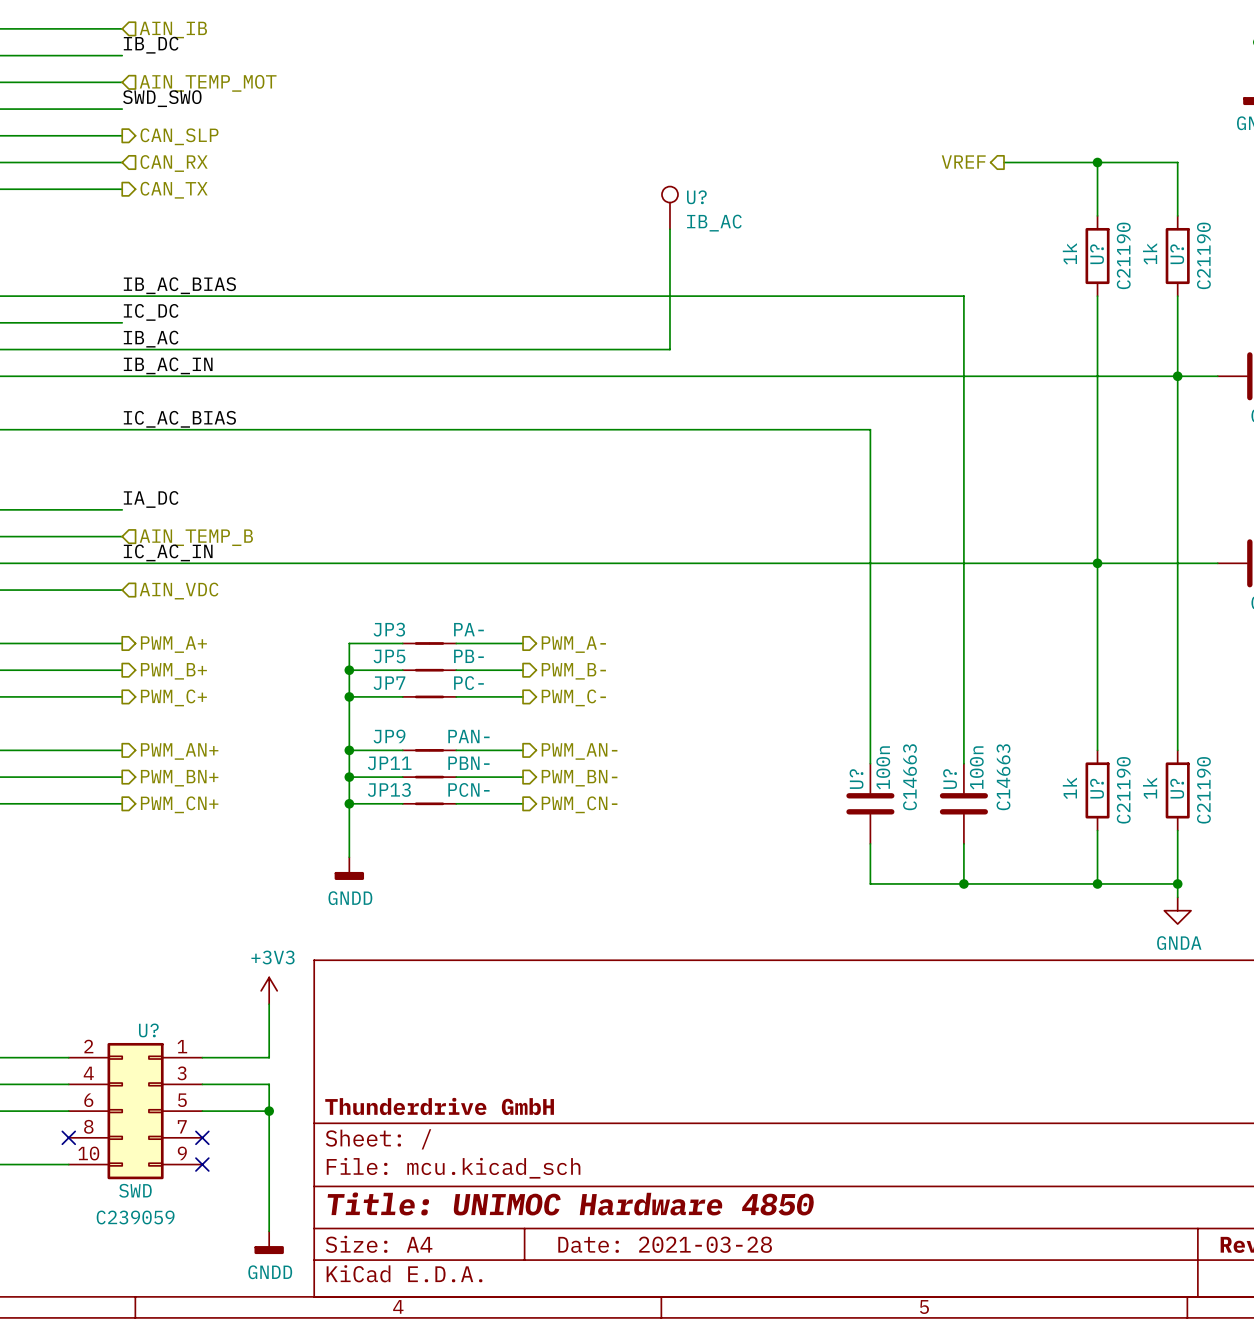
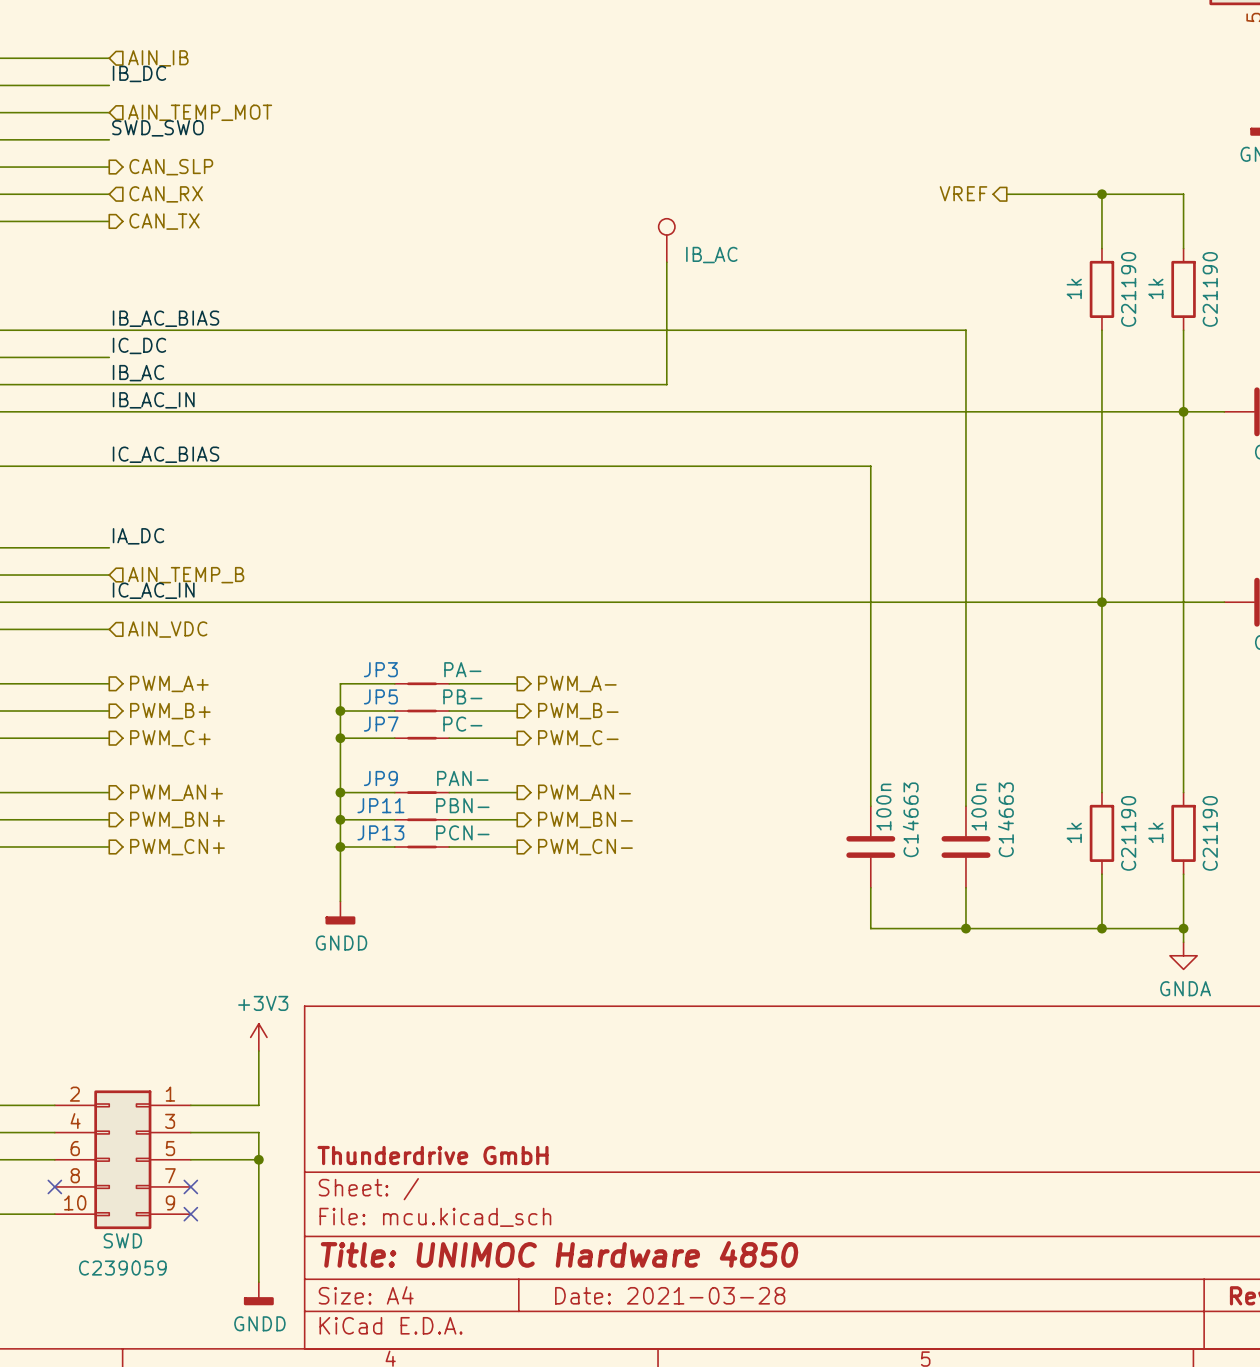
U? name: U? (696, 197) -> none
U? name: U? (1097, 254) -> none
U? name: U? (1177, 254) -> none
U? name: U? (856, 779) -> none
U? name: U? (950, 779) -> none
U? name: U? (1097, 788) -> none
U? name: U? (1177, 788) -> none
U? name: U? (148, 1030) -> none

